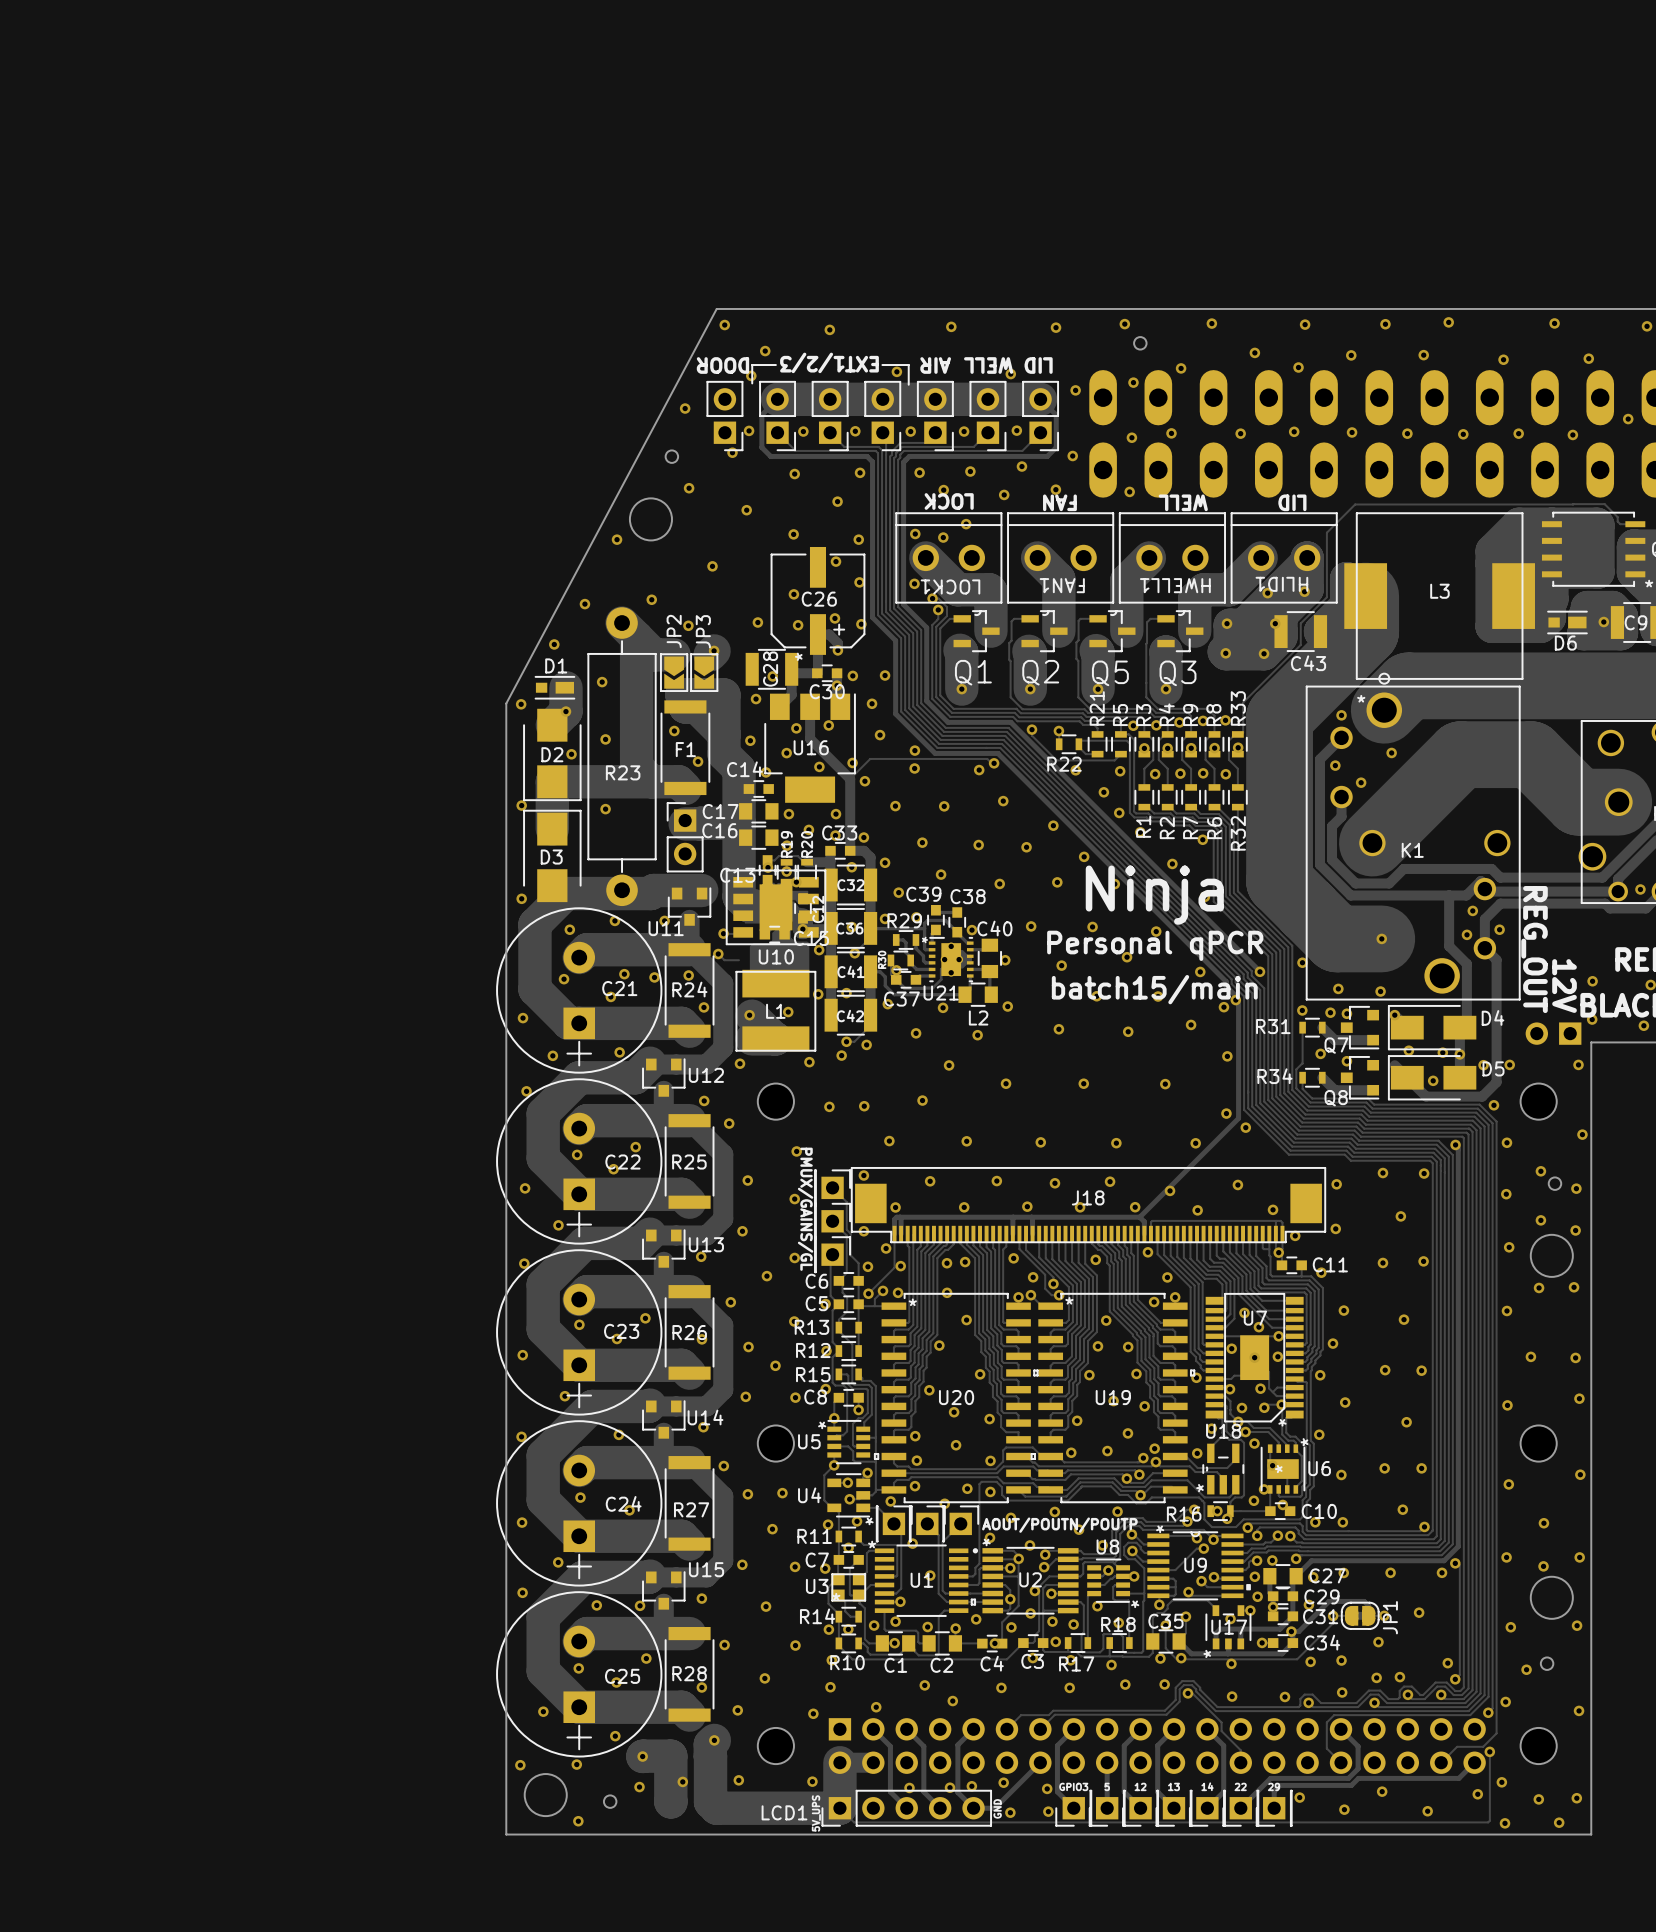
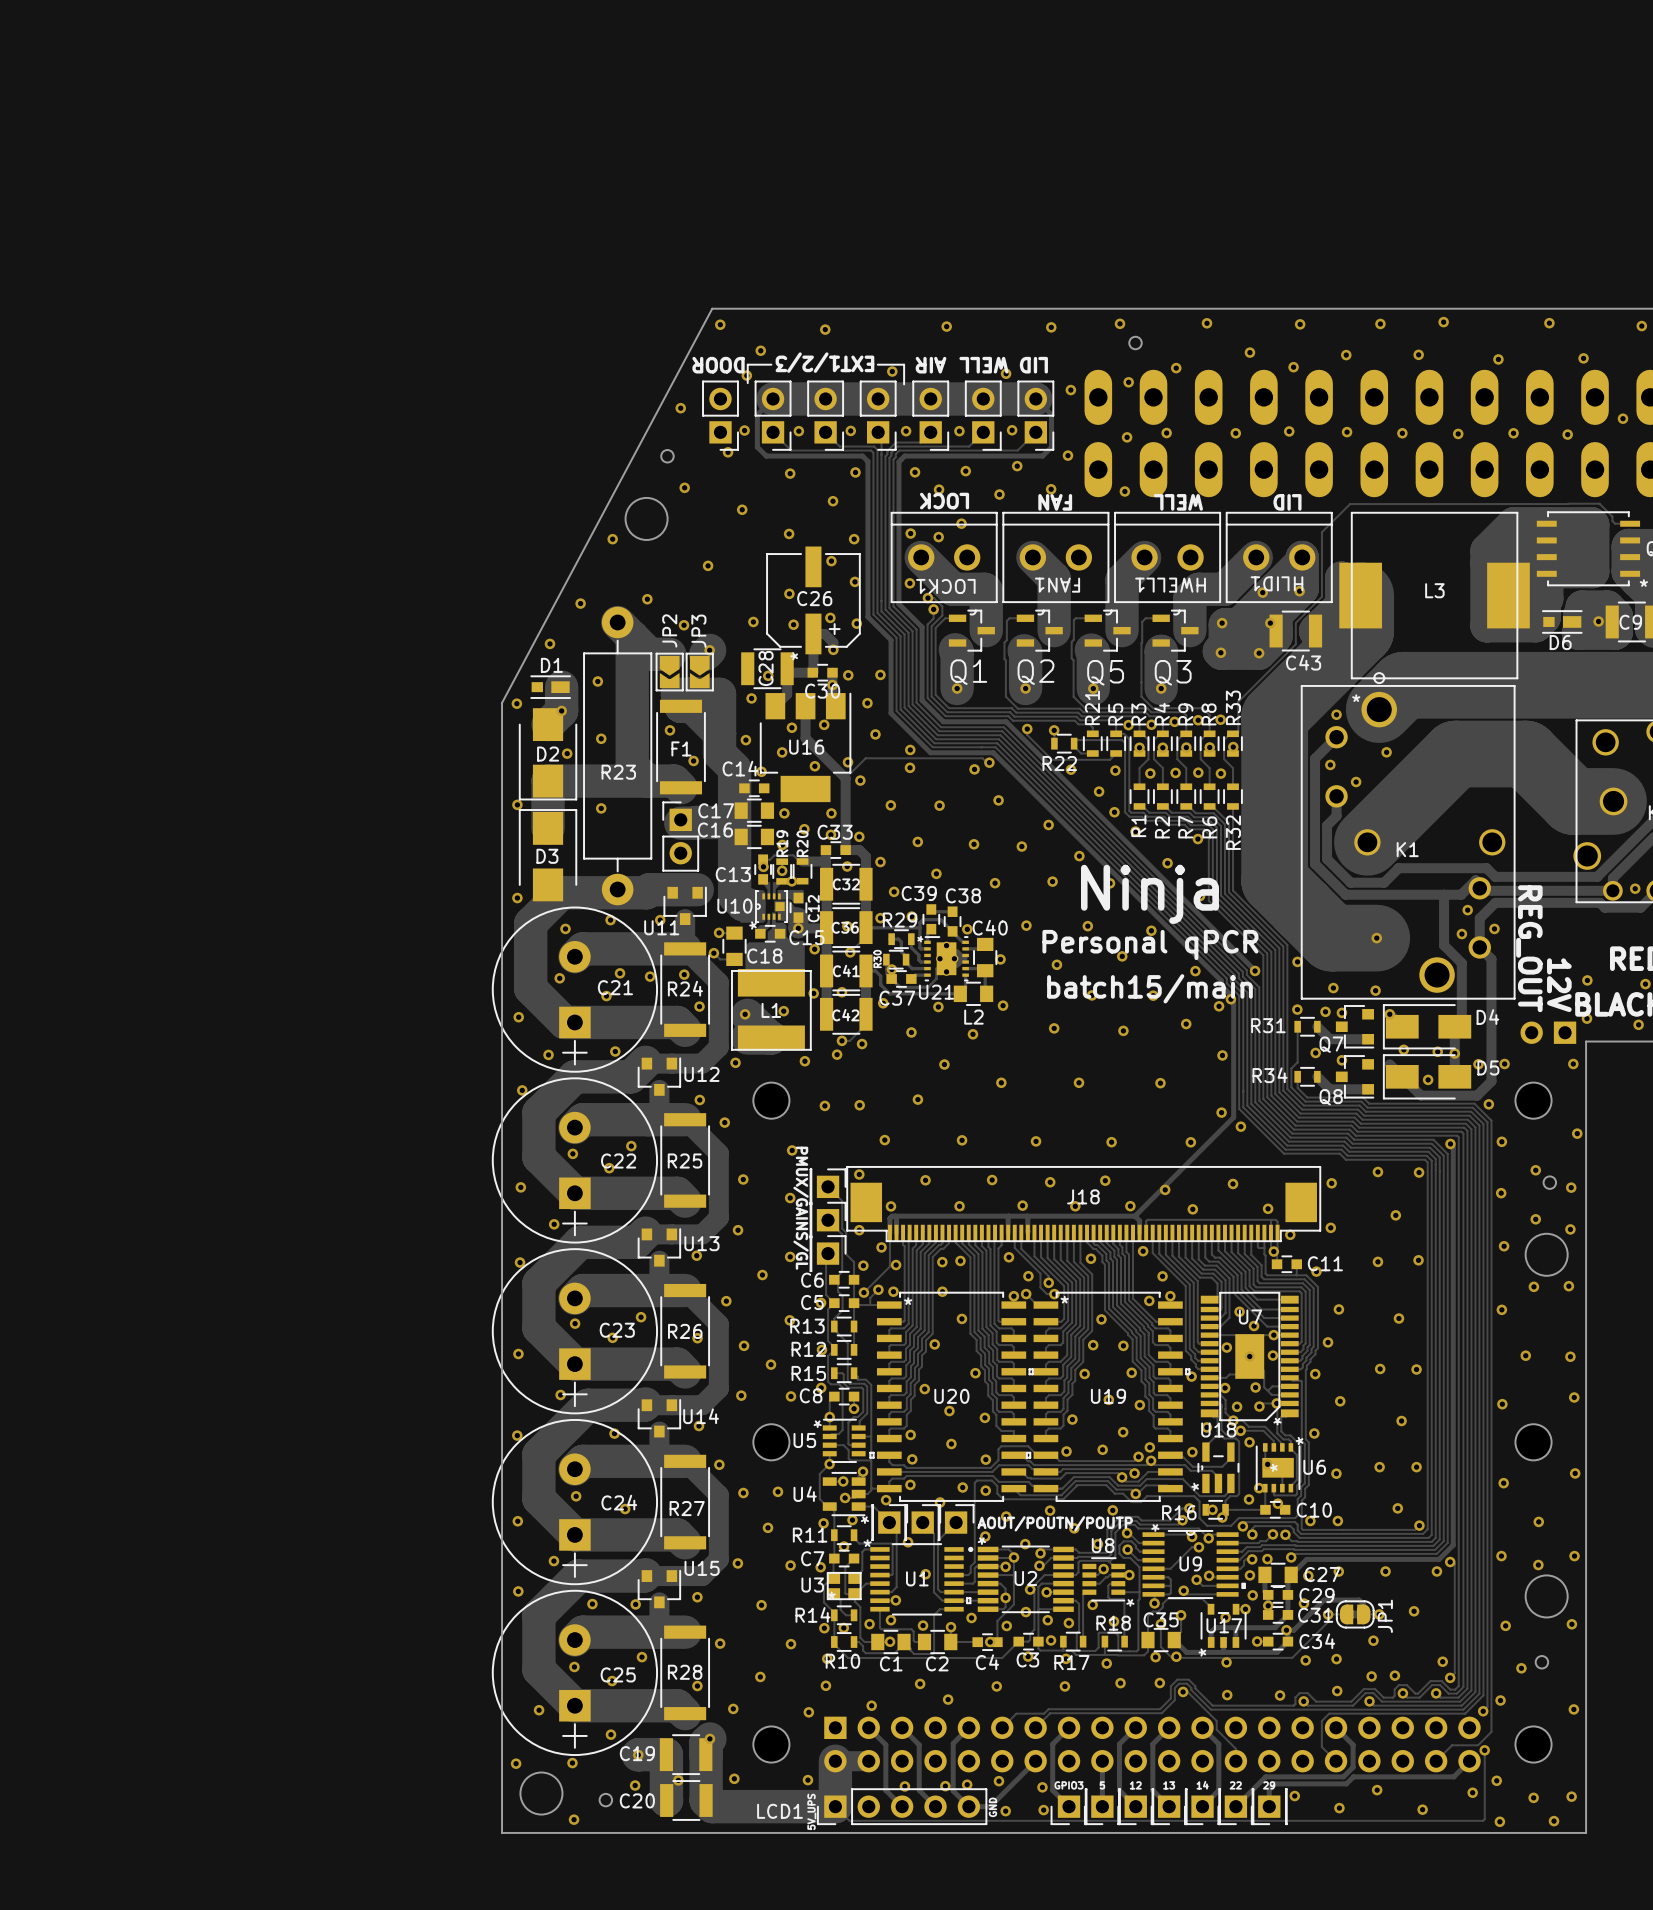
U10 footprint: [725, 869, 827, 946] -> [755, 890, 788, 923]
C18: none -> (734, 946)
U10 name position: U10 (776, 956) -> U10 (734, 906)
C19: none -> (686, 1754)
C20: none -> (686, 1800)

